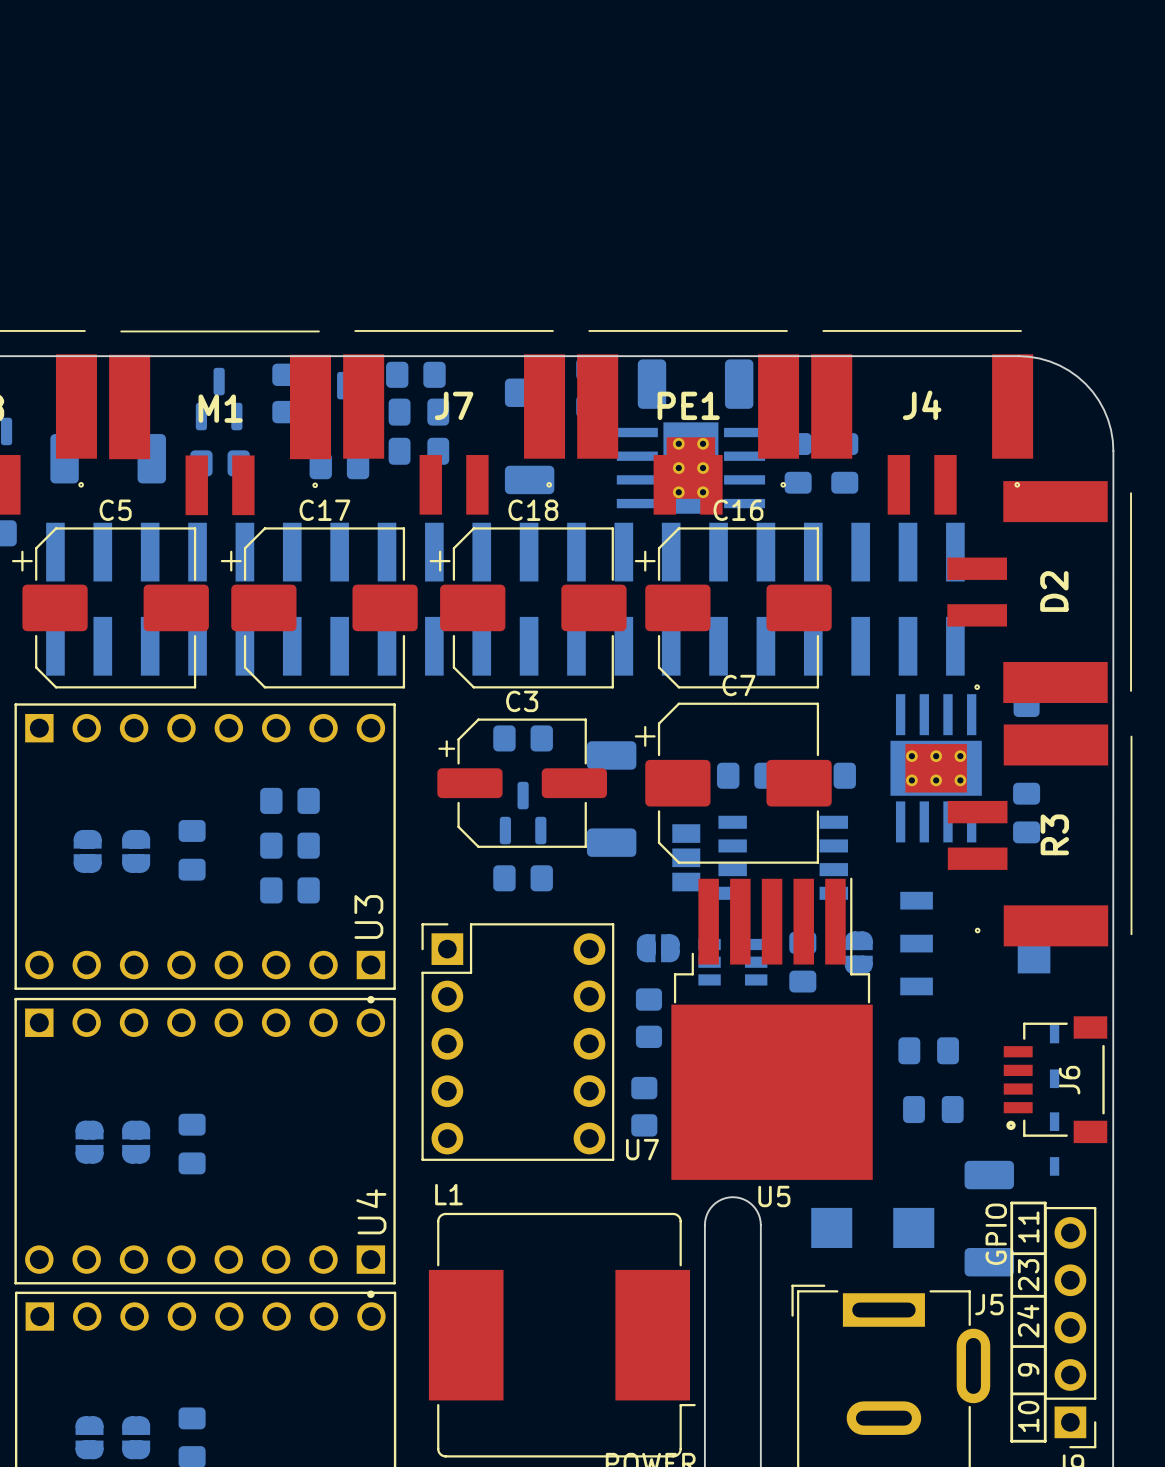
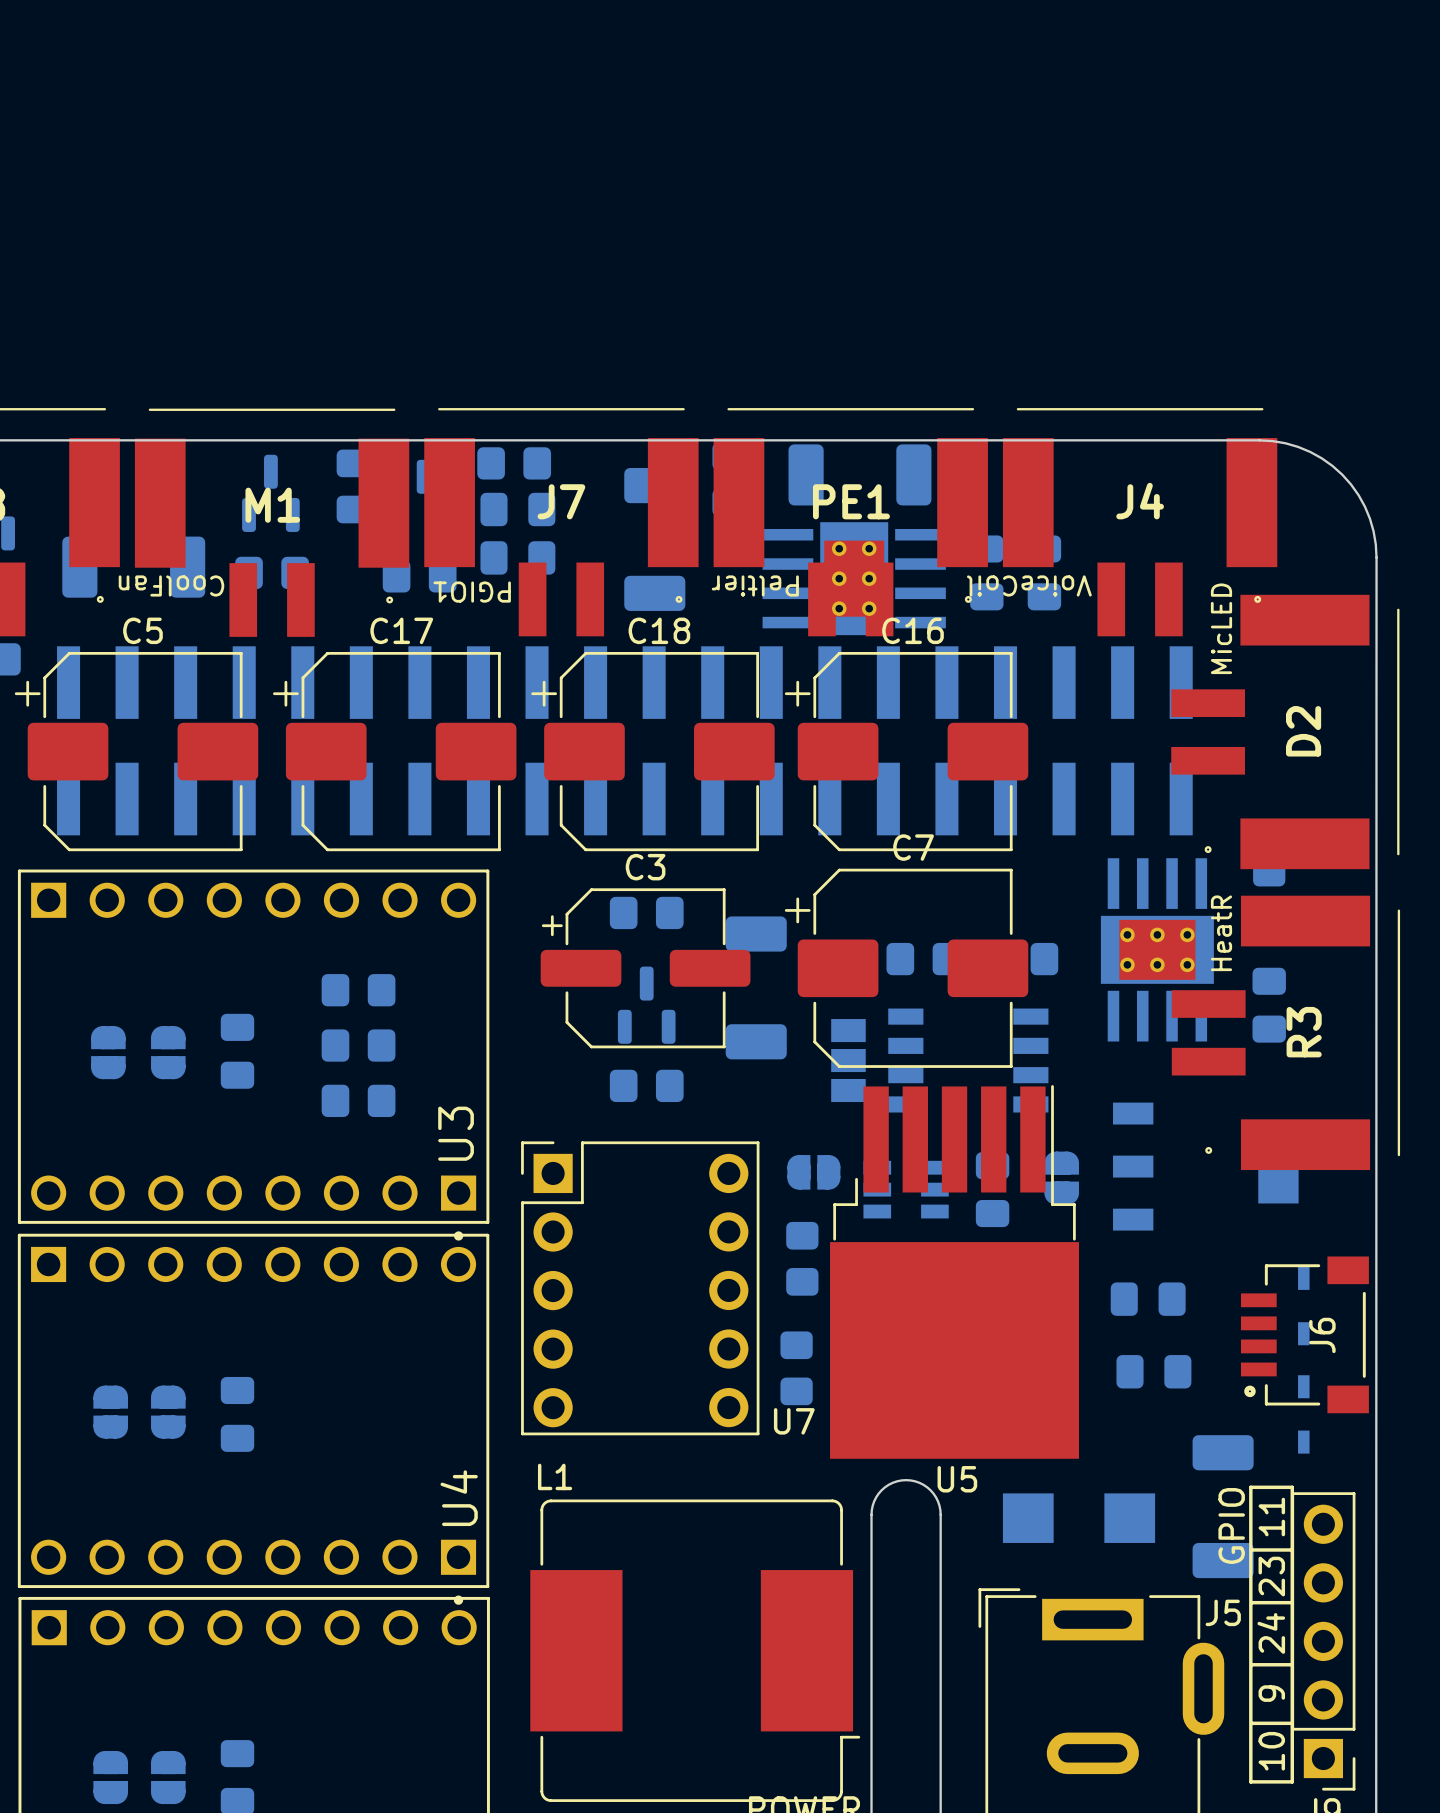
text: none -> CoolFan (171, 585)
text: none -> Peltier (755, 585)
text: none -> VoiceCoil (1029, 585)
text: none -> PGIO1 (472, 592)
text: none -> MicLED (1221, 628)
text: none -> HeatR (1221, 933)

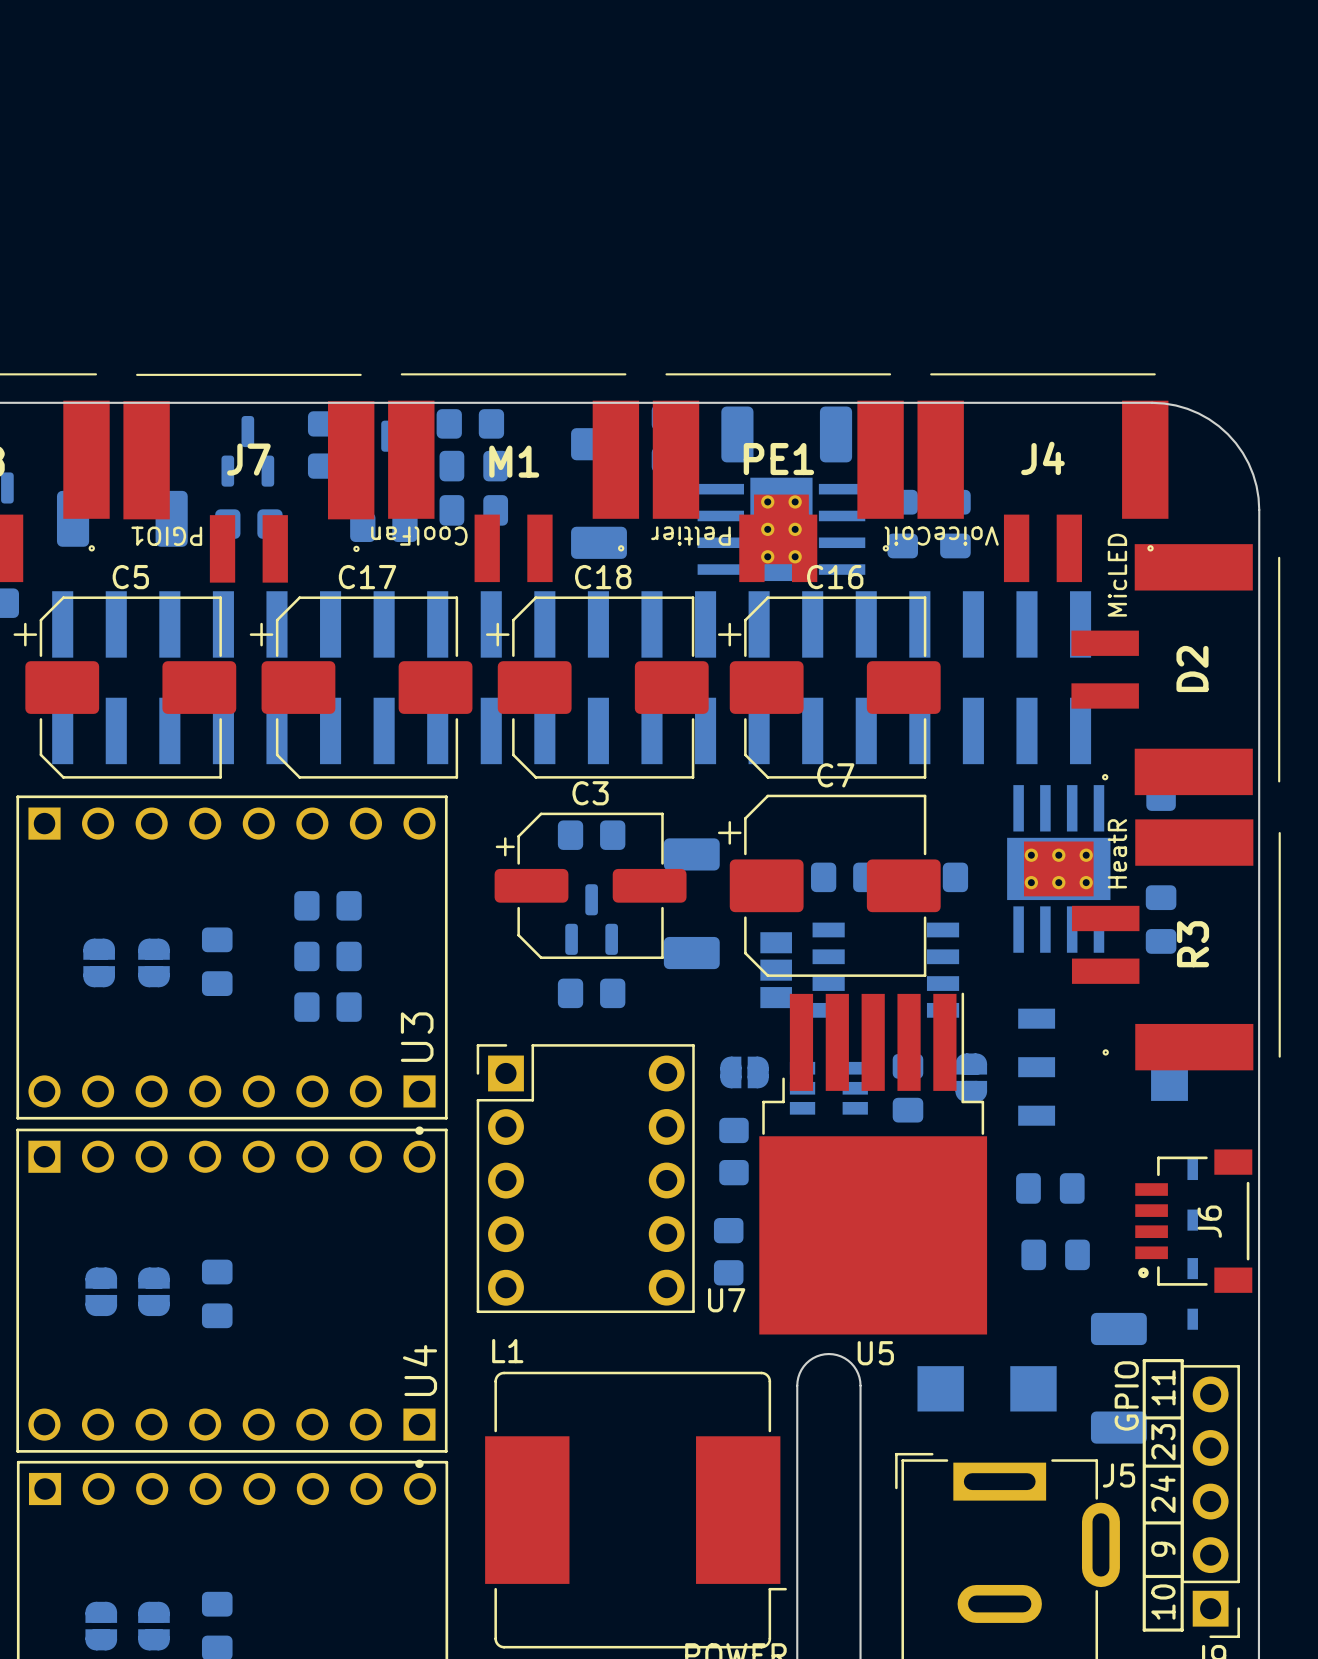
J7 name: J7 (561, 501) -> M1 (514, 461)
M1 name: M1 (272, 505) -> J7 (248, 459)
text: CoolFan (171, 585) -> PGIO1 (166, 536)
text: PGIO1 (472, 592) -> CoolFan (419, 536)

